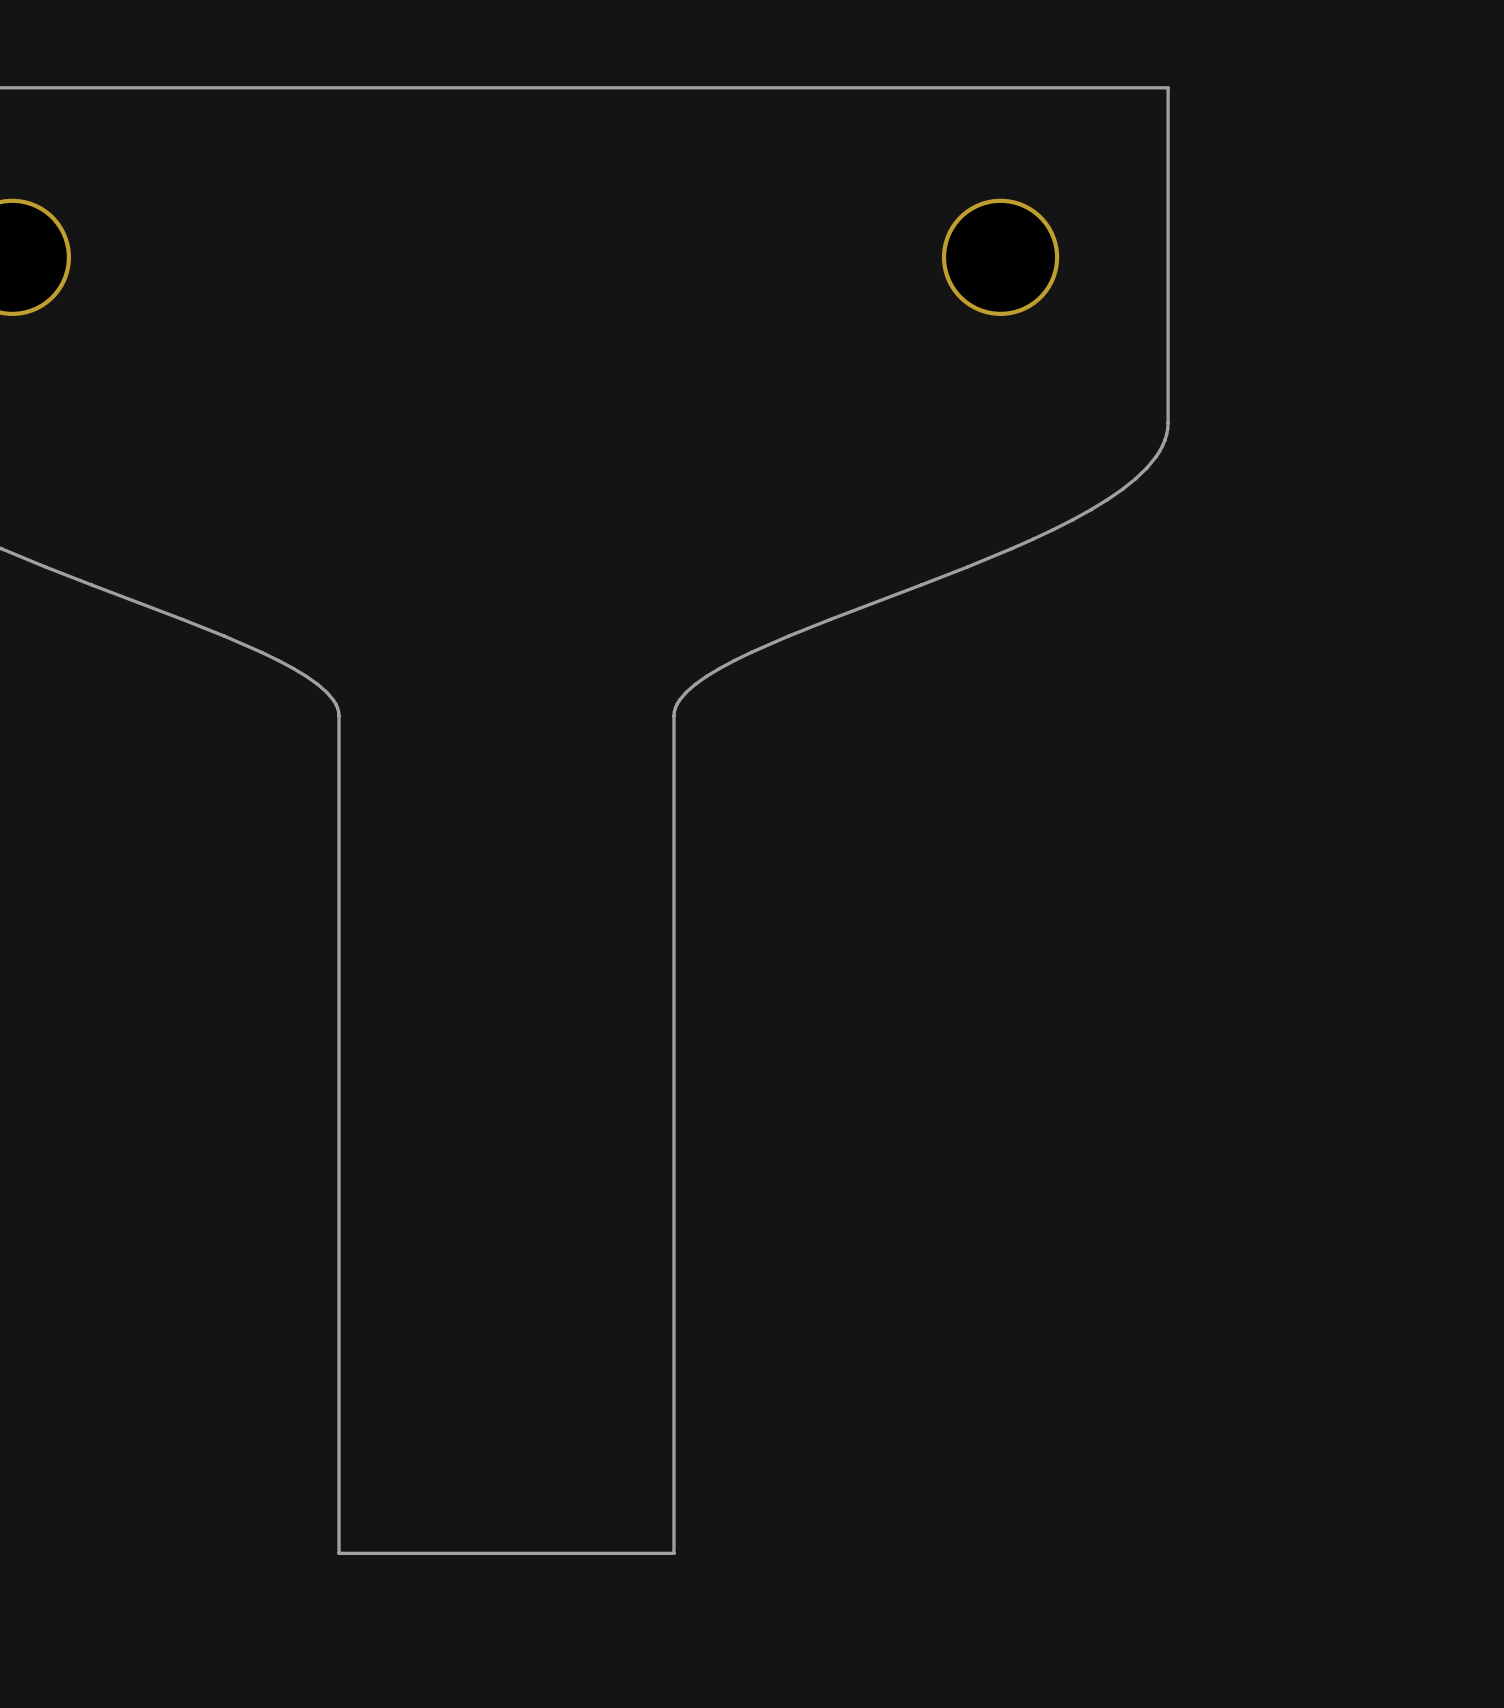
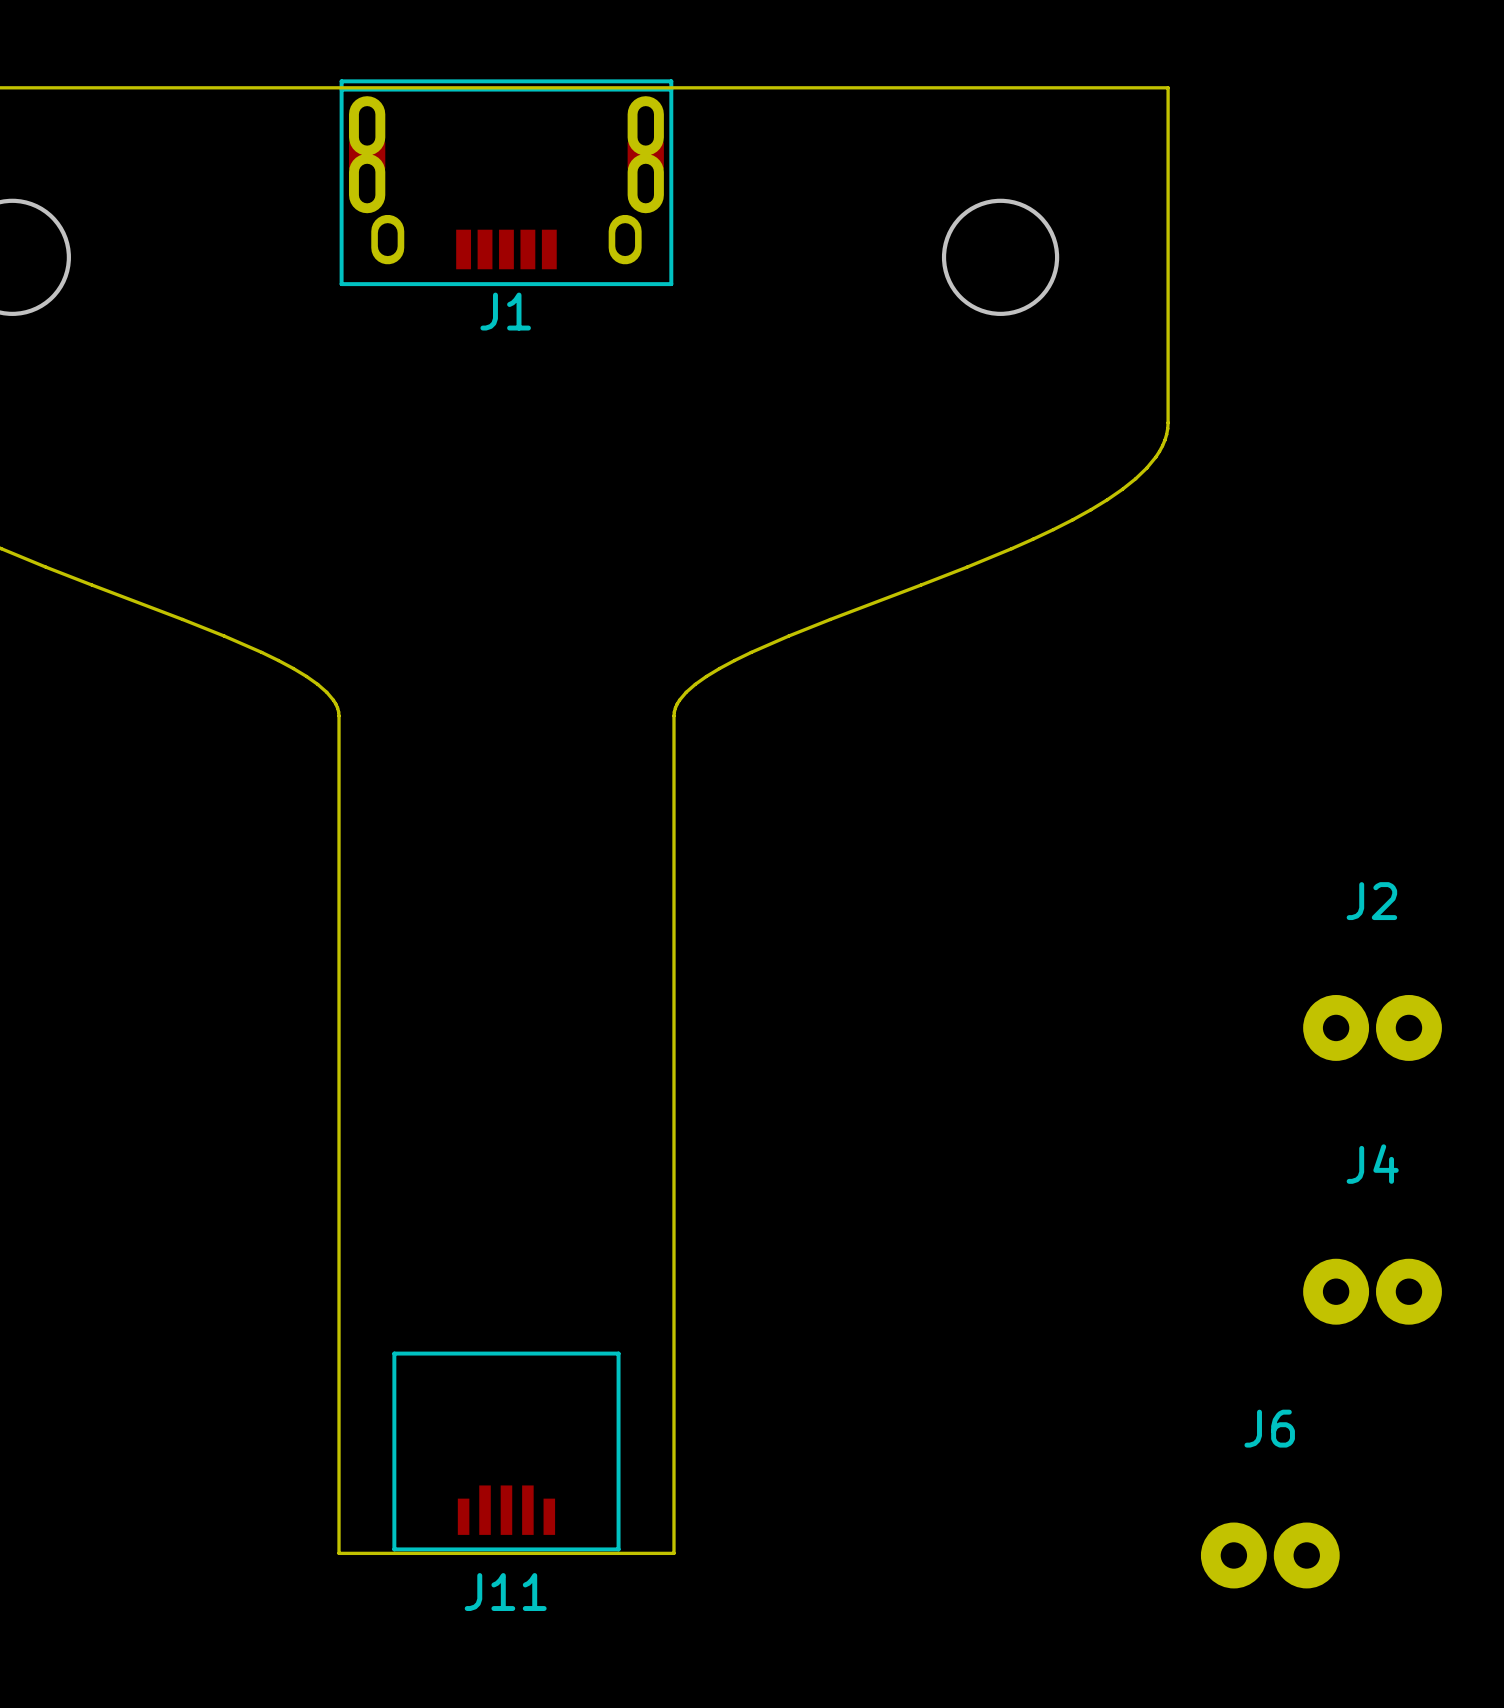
J1: none -> (506, 182)
J2: none -> (1372, 1027)
J4: none -> (1372, 1291)
J11: none -> (506, 1451)
J6: none -> (1270, 1555)

